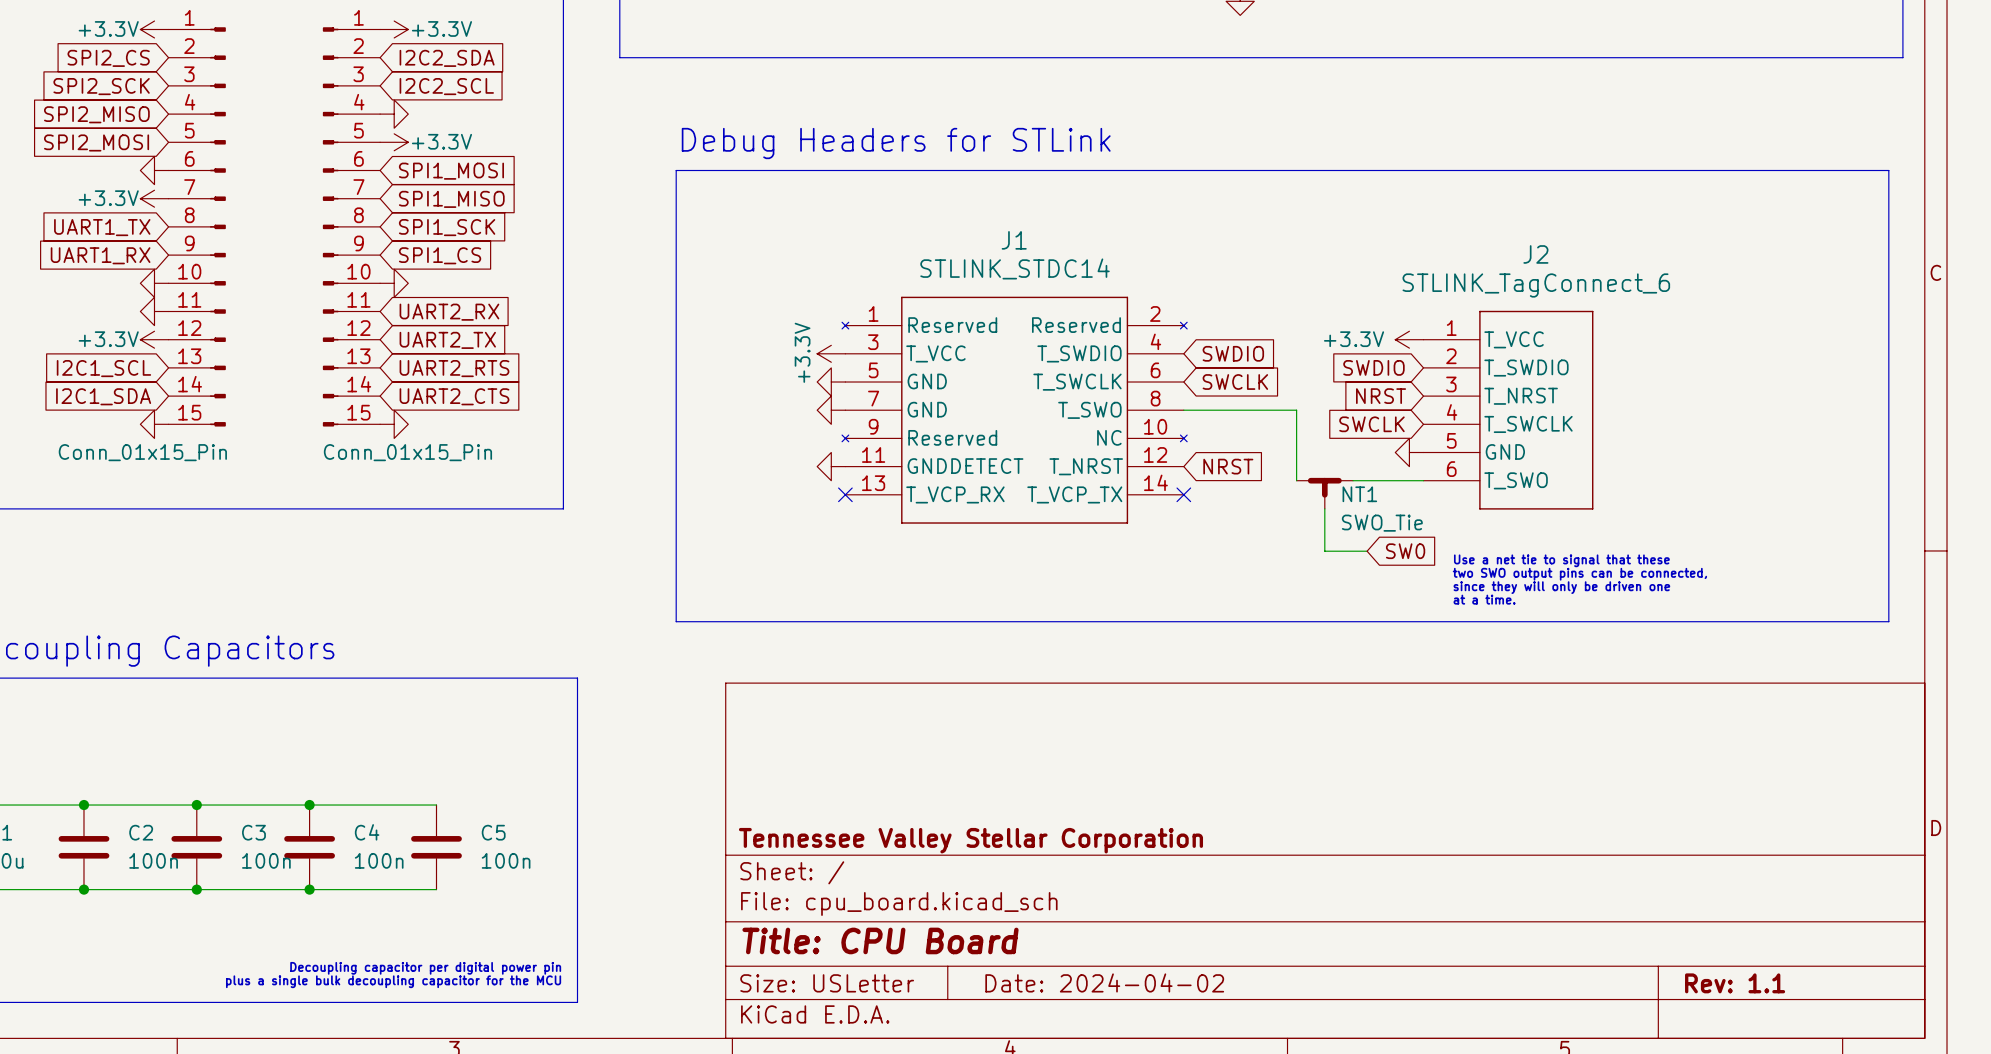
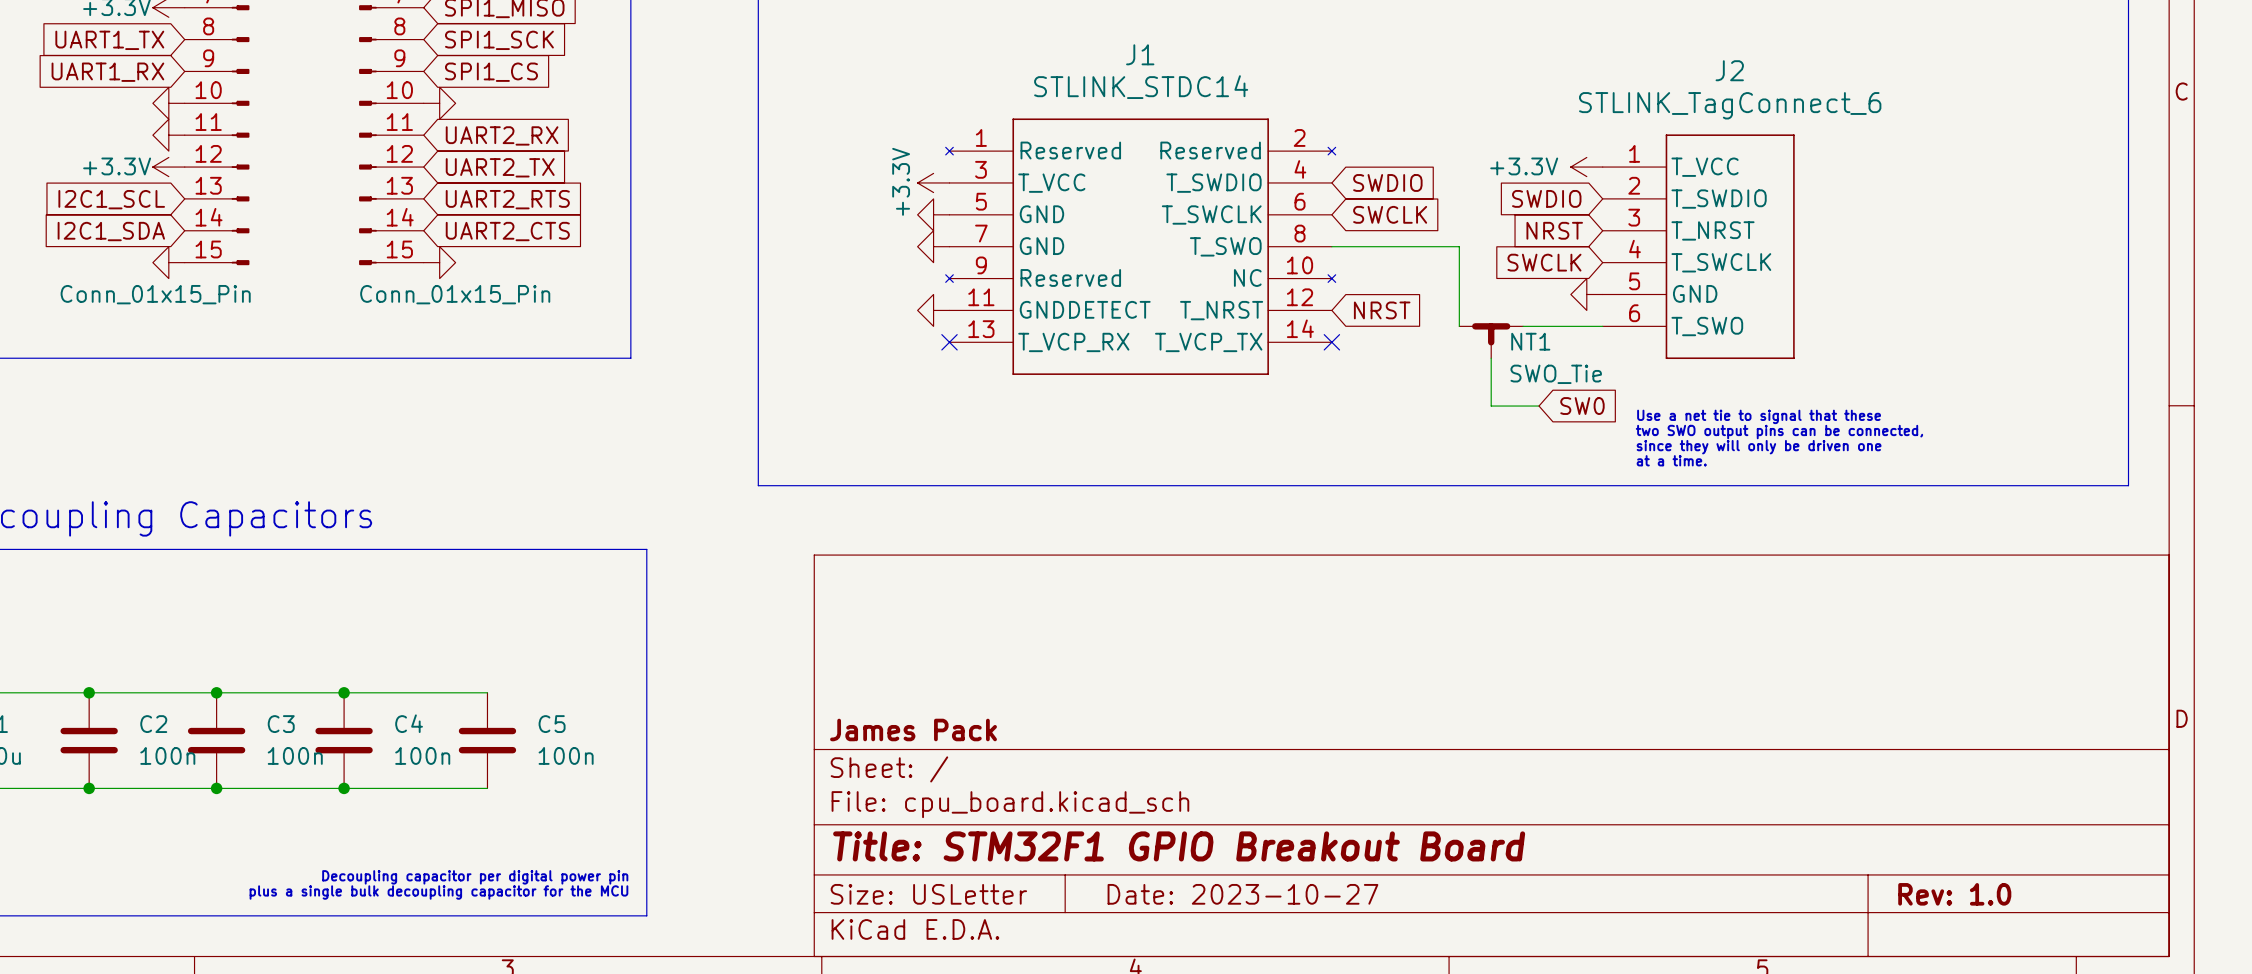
title block: Tennessee Valley Stellar Corporation (970, 840) -> James Pack (913, 729)
title block: Title: CPU Board (880, 940) -> Title: STM32F1 GPIO Breakout Board (1179, 846)
title block: Date: 2024-04-02 (1104, 982) -> Date: 2023-10-27 (1242, 894)
title block: Rev: 1.1 (1735, 983) -> Rev: 1.0 (1954, 894)

